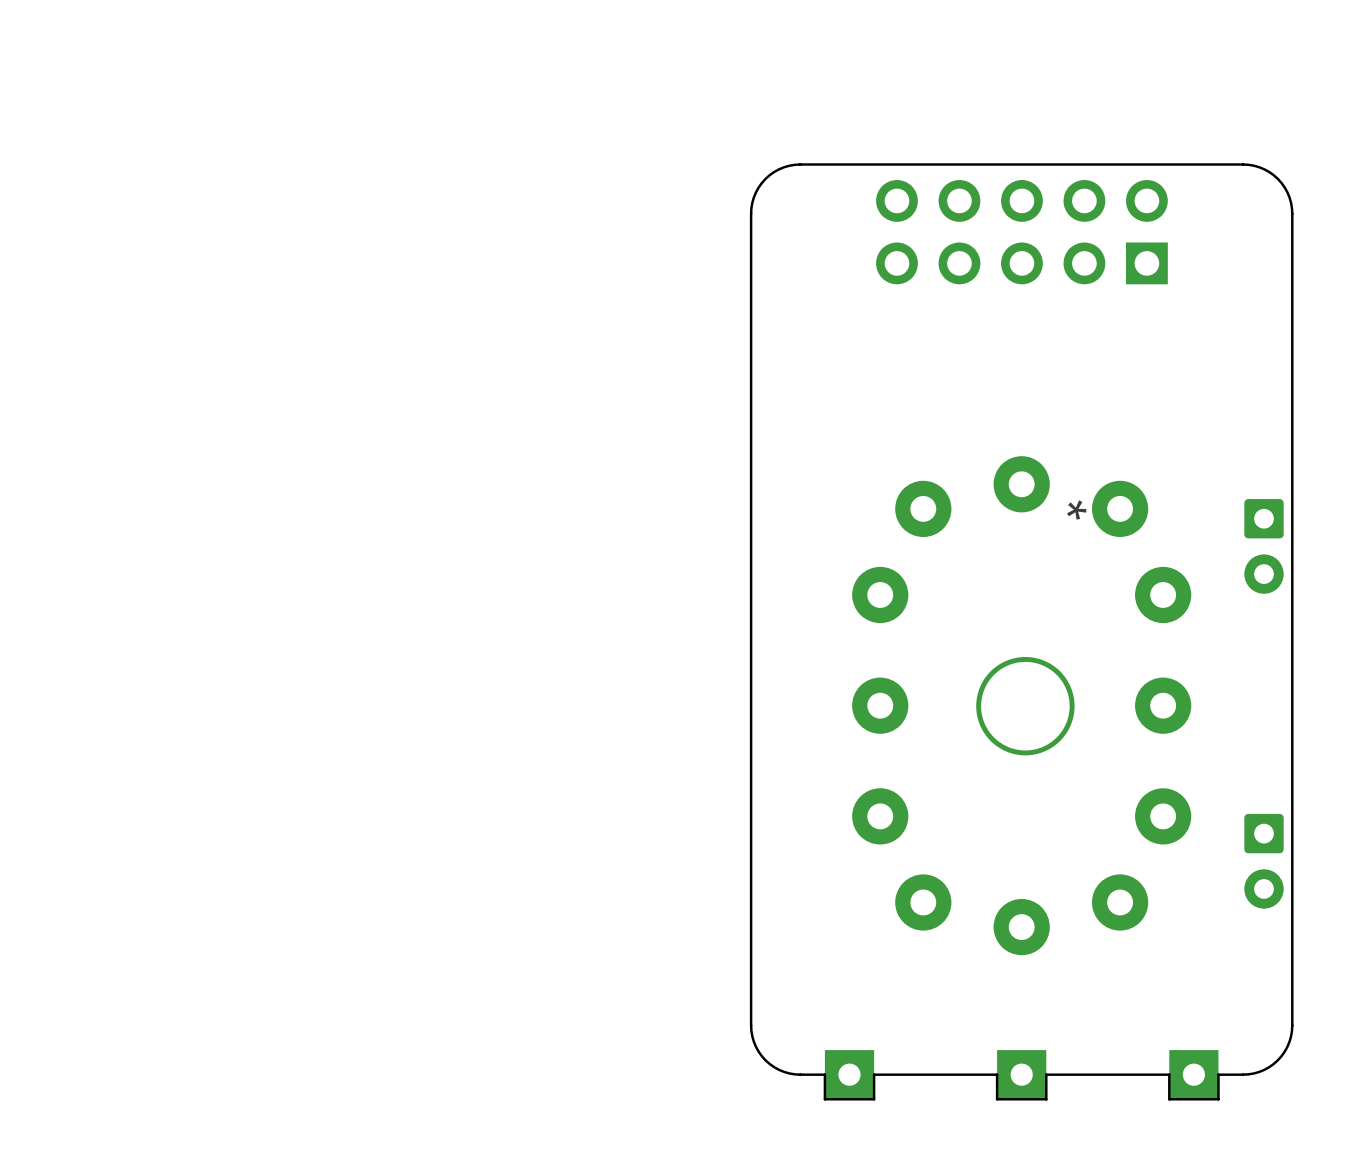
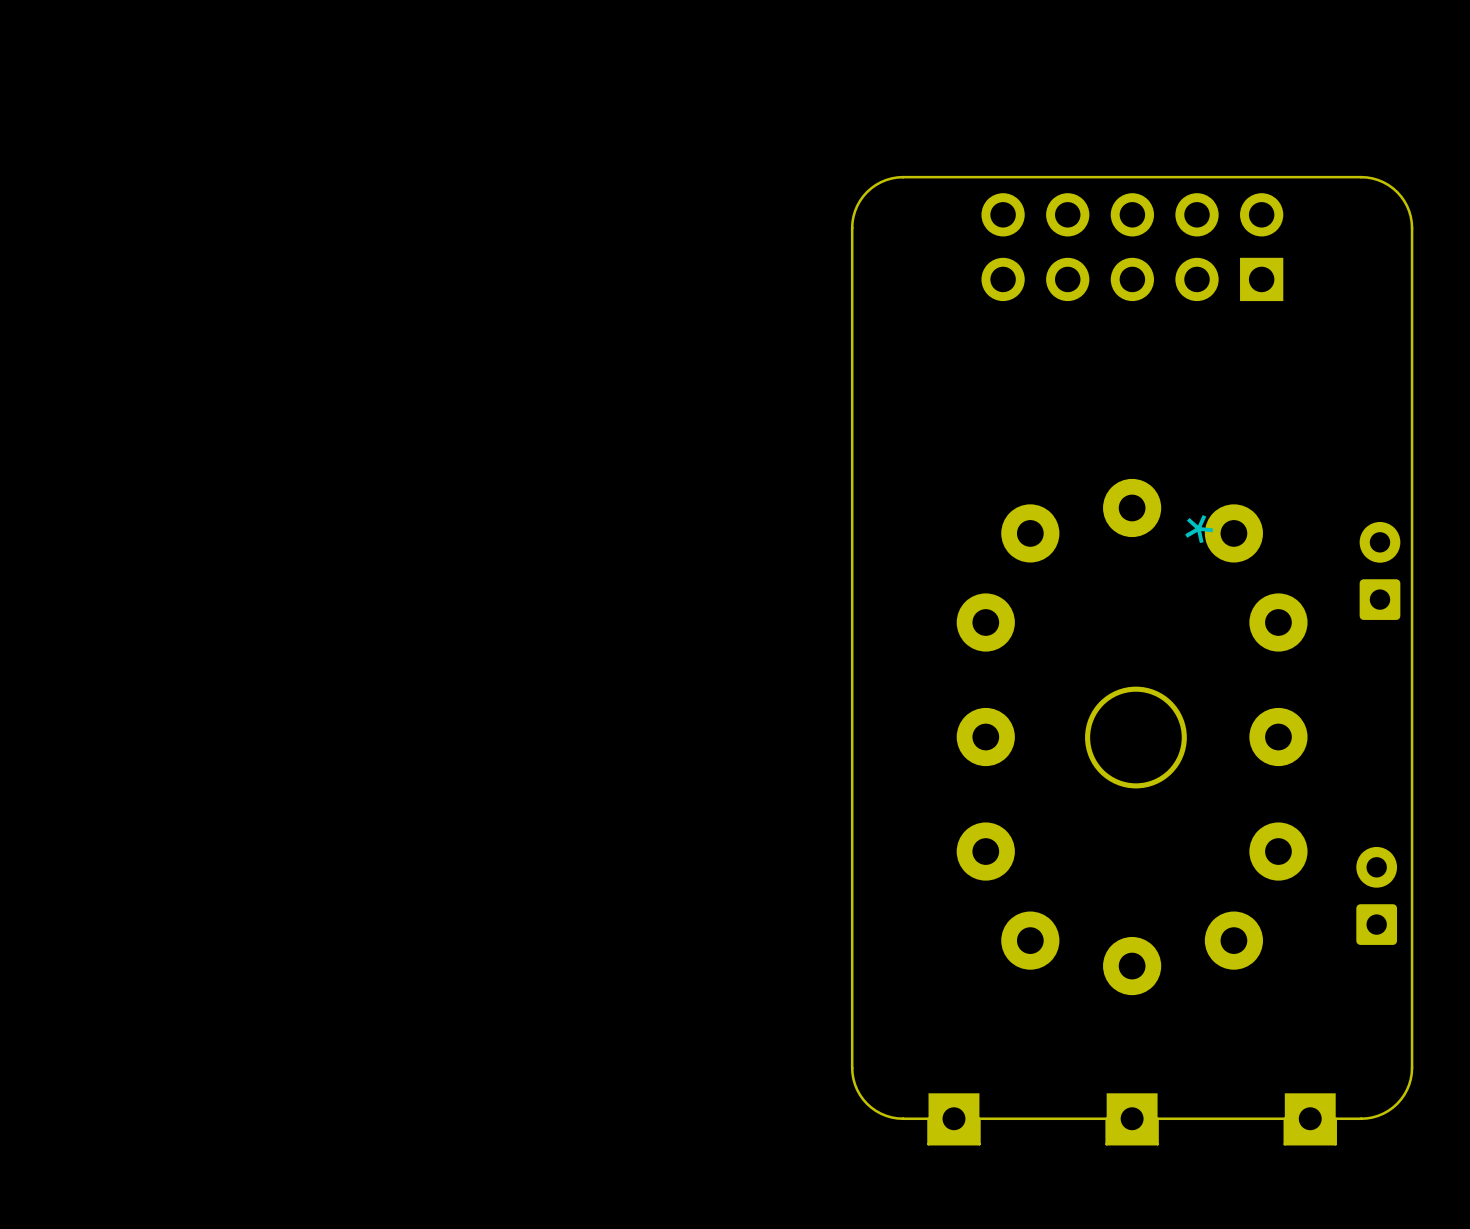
part rotation: 0° (1264, 546) -> 180° (1379, 570)
part rotation: 0° (1264, 861) -> 180° (1376, 895)

